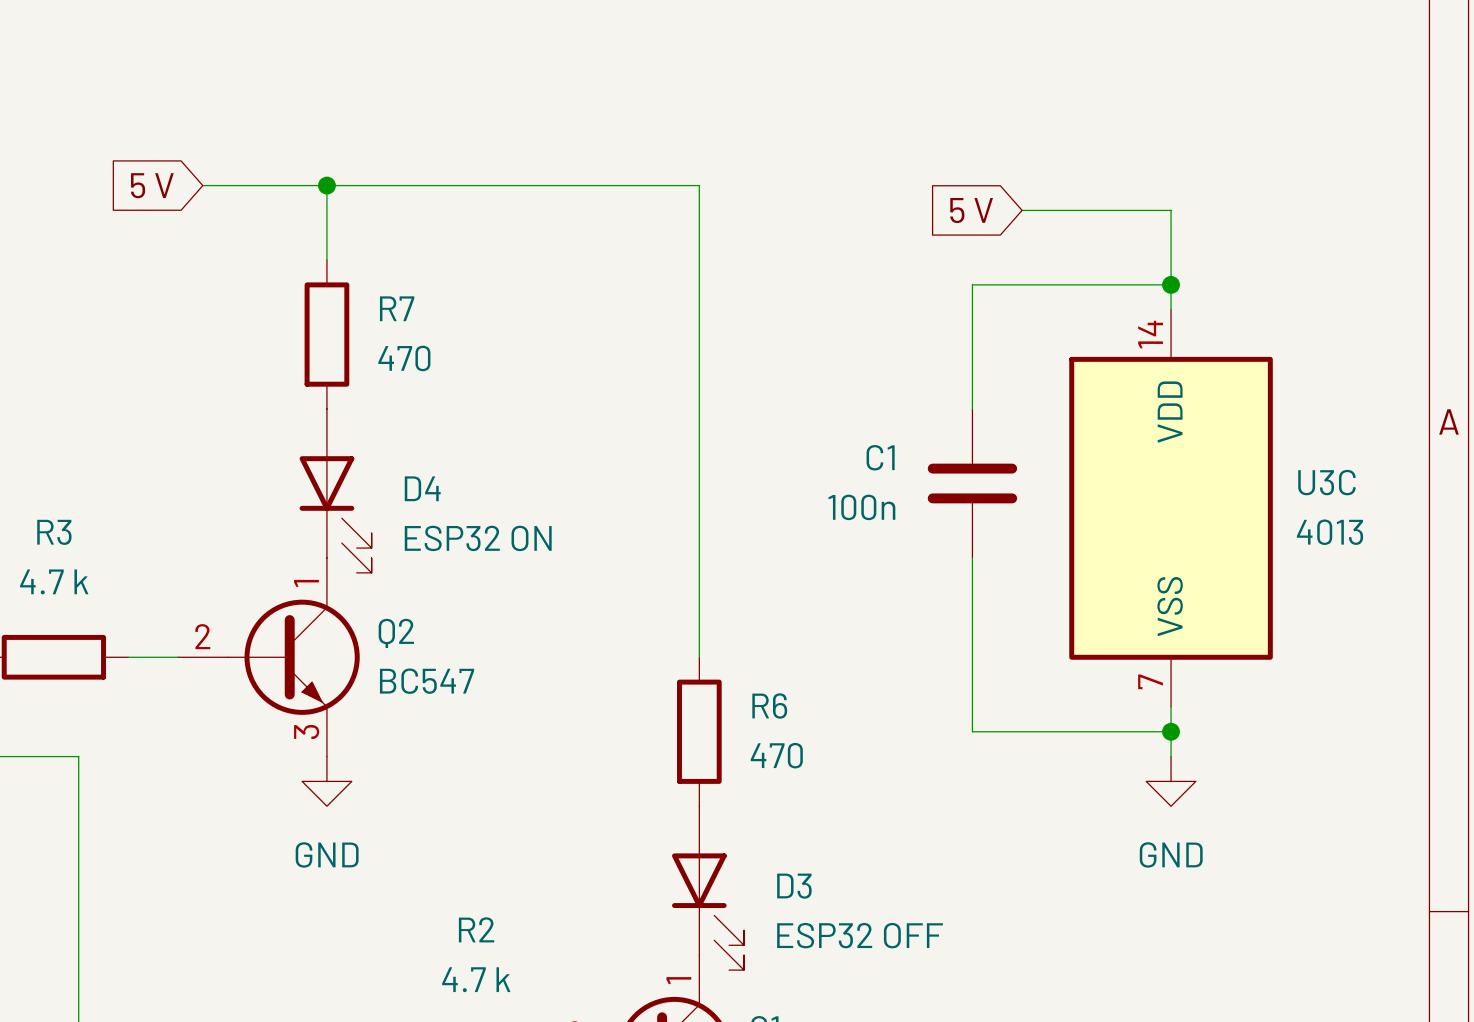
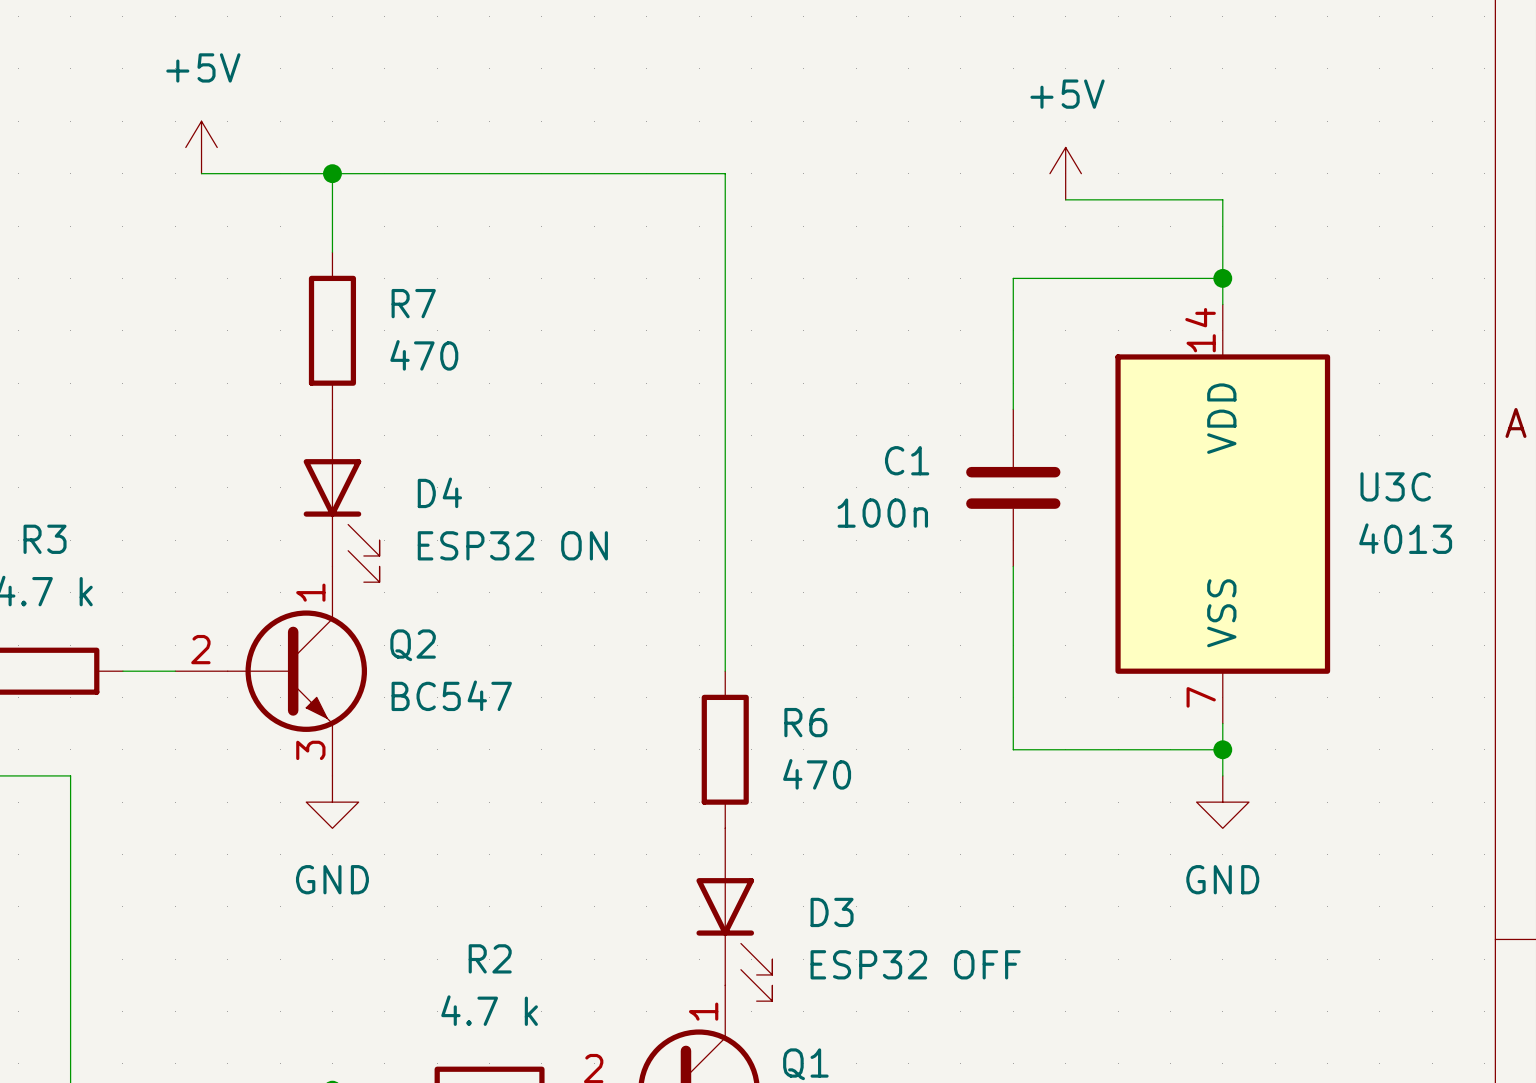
power symbol: none -> +5V (201, 147)
global label: 5 V (152, 185) -> none
power symbol: none -> +5V (1065, 173)
global label: 5 V (971, 210) -> none

